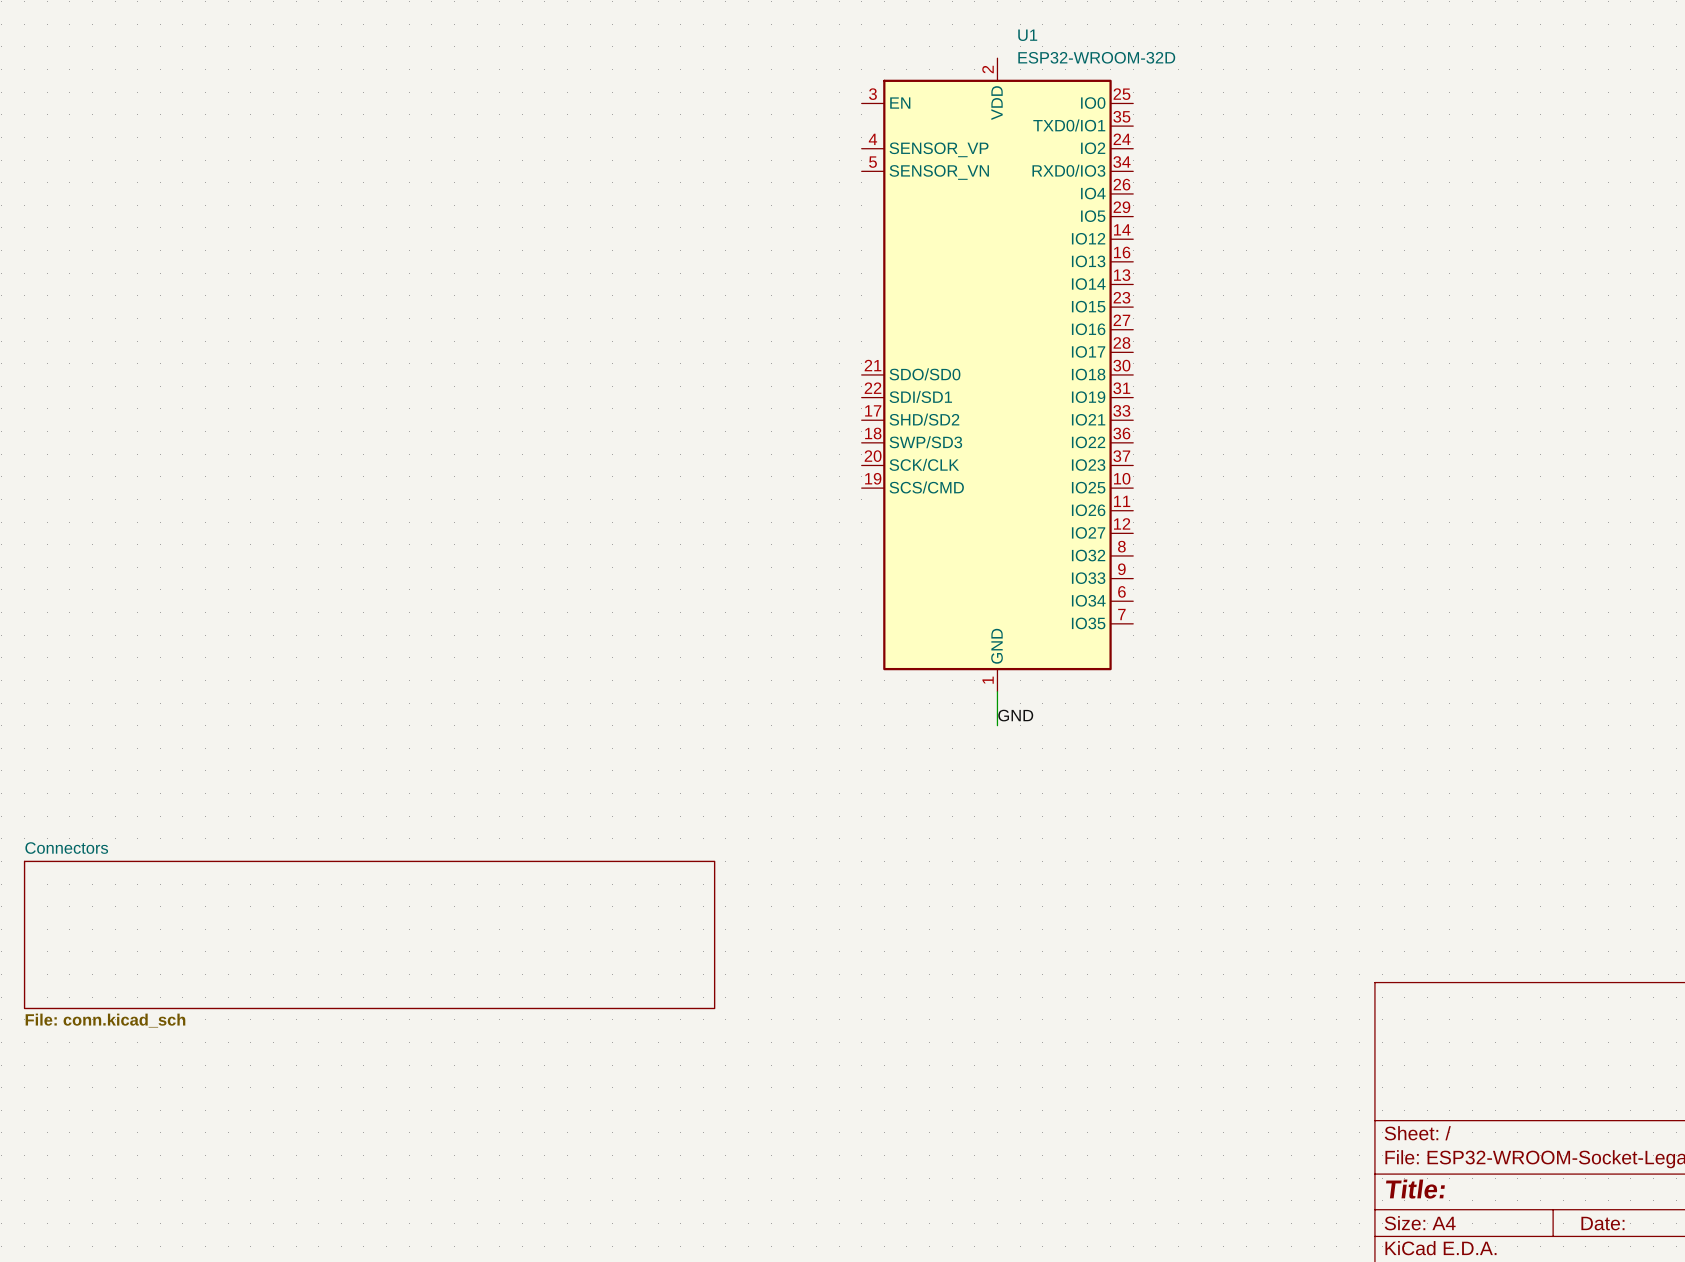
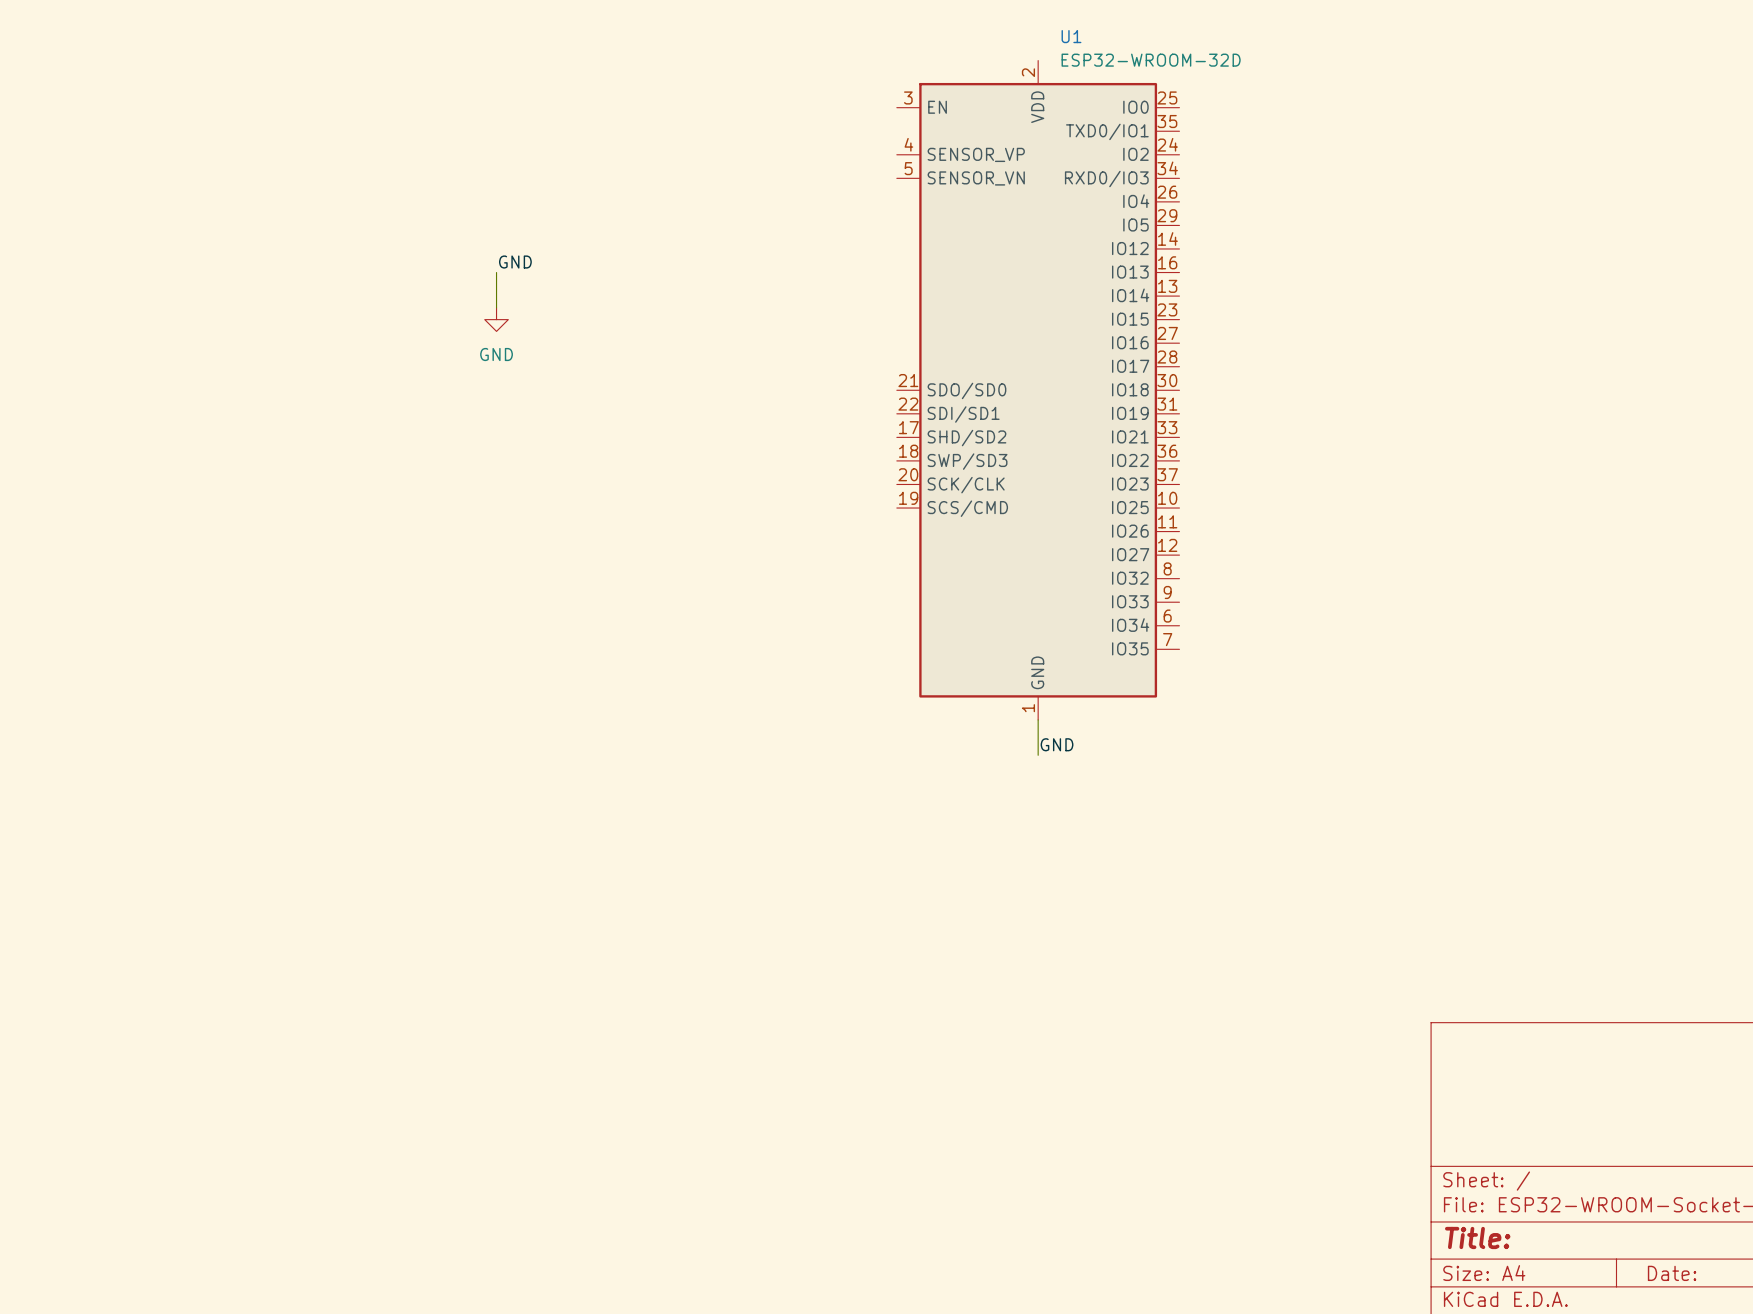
label: none -> GND (515, 262)
wire: none -> (496, 272) (496, 307)
power symbol: none -> GND (496, 319)
sheet Connectors: File: conn.kicad_sch (369, 934) -> none

